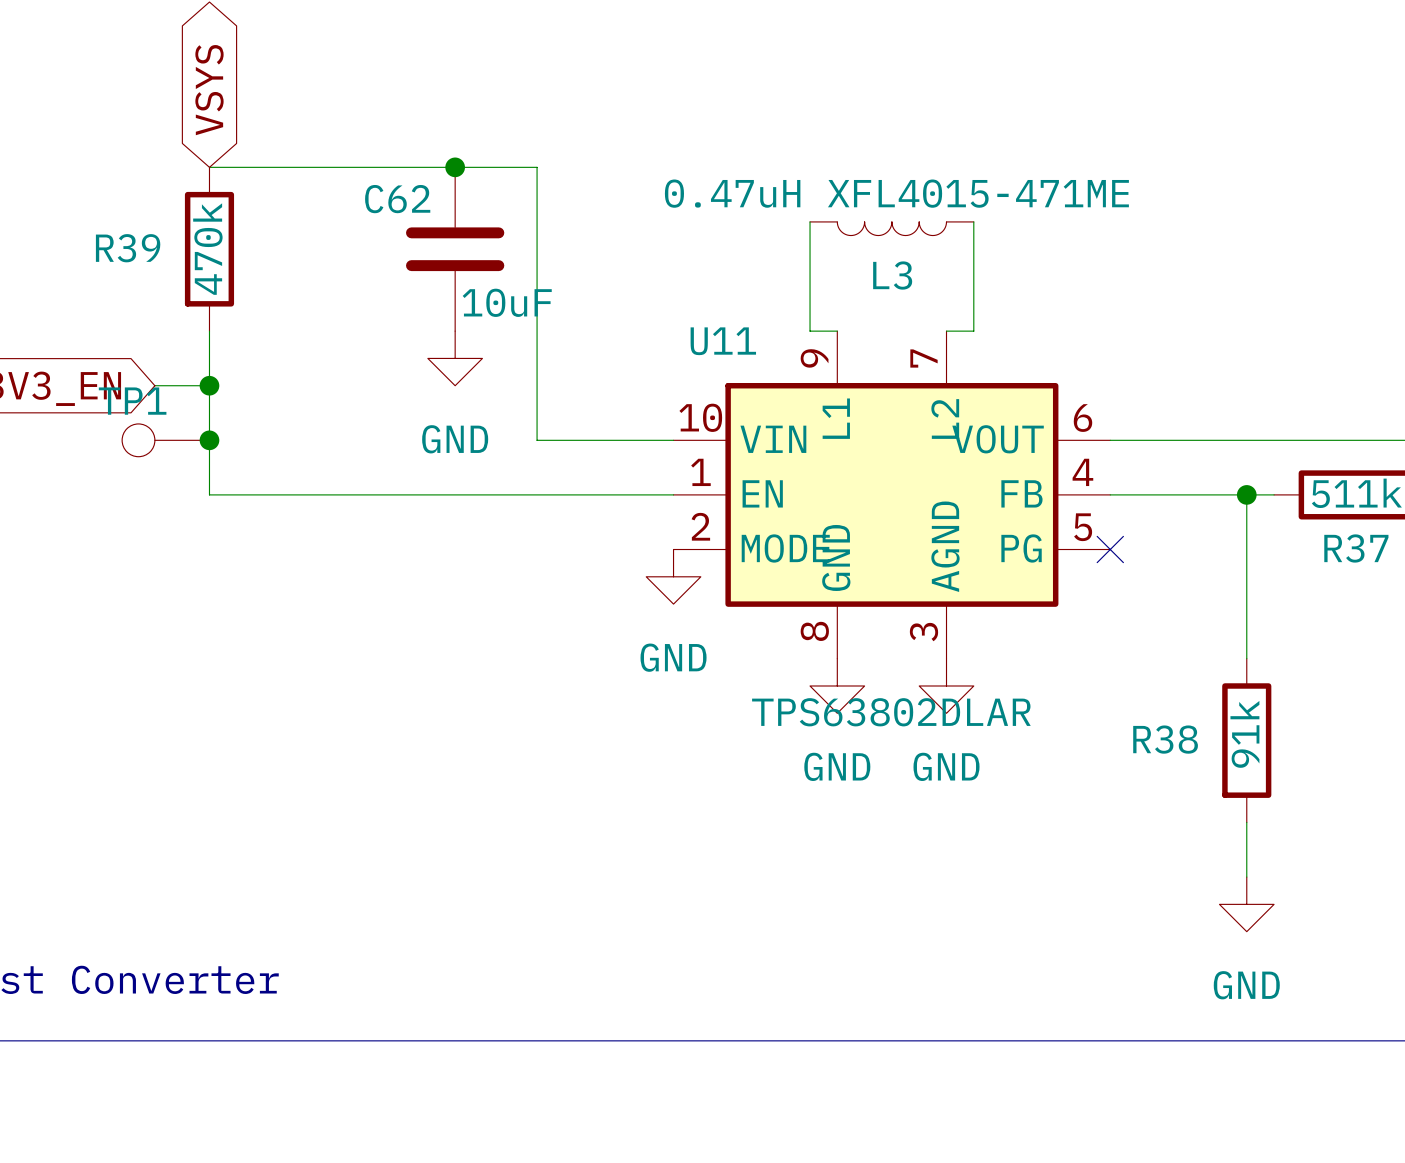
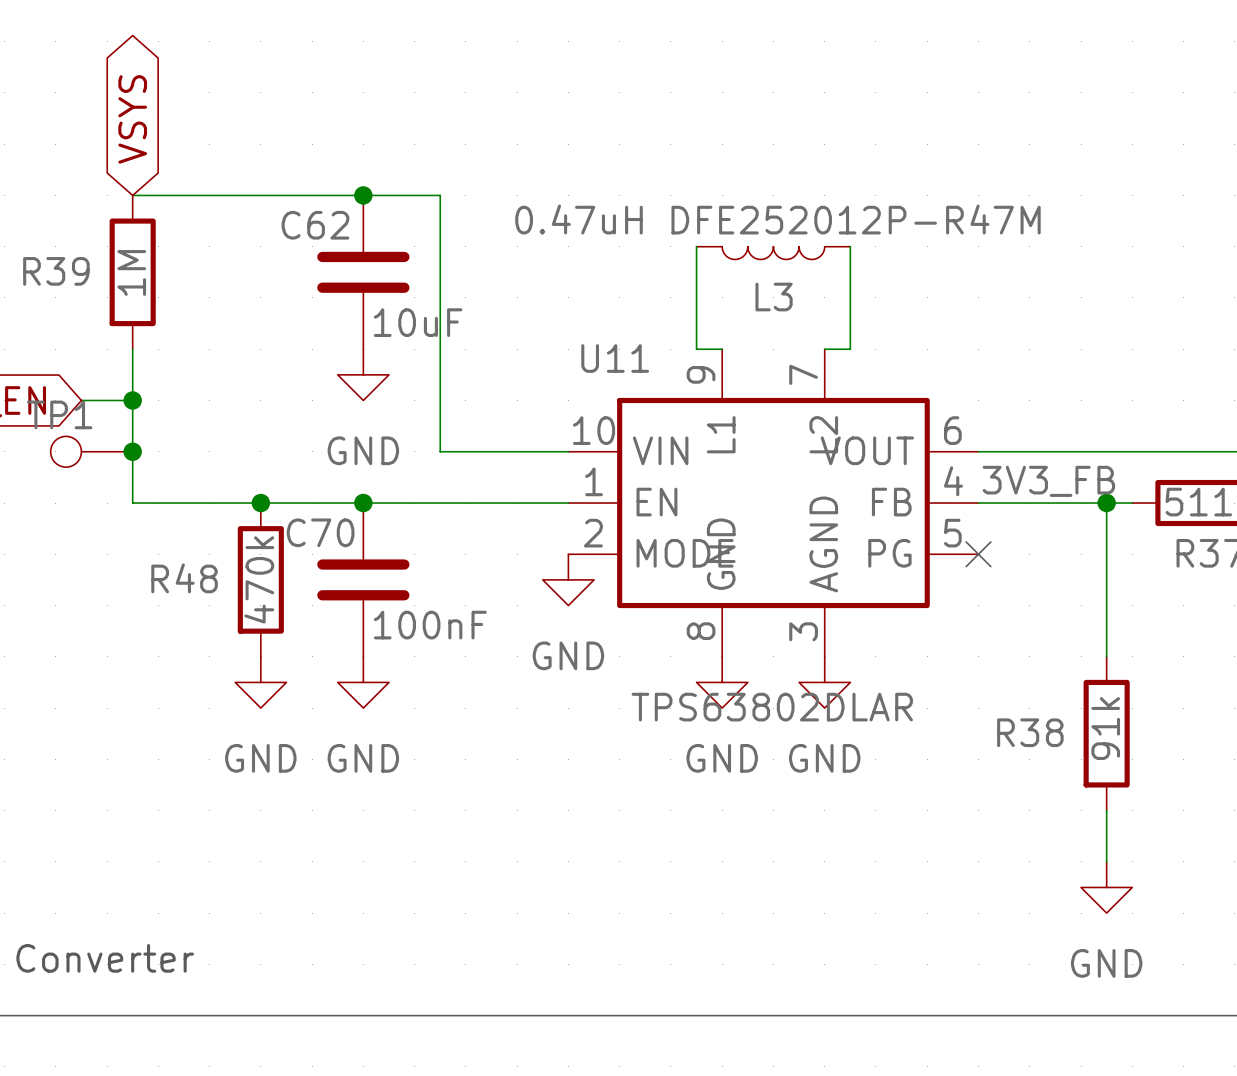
L3 value: 0.47uH XFL4015-471ME (896, 193) -> 0.47uH DFE252012P-R47M (777, 219)
R39 value: 470k (207, 249) -> 1M (131, 272)
label: none -> 3V3_FB (1048, 481)
junction: none -> (260, 503)
junction: none -> (363, 503)
R48: none -> 470k (260, 579)
C70: none -> 100nF (363, 579)
power symbol: none -> GND (260, 682)
power symbol: none -> GND (363, 682)

